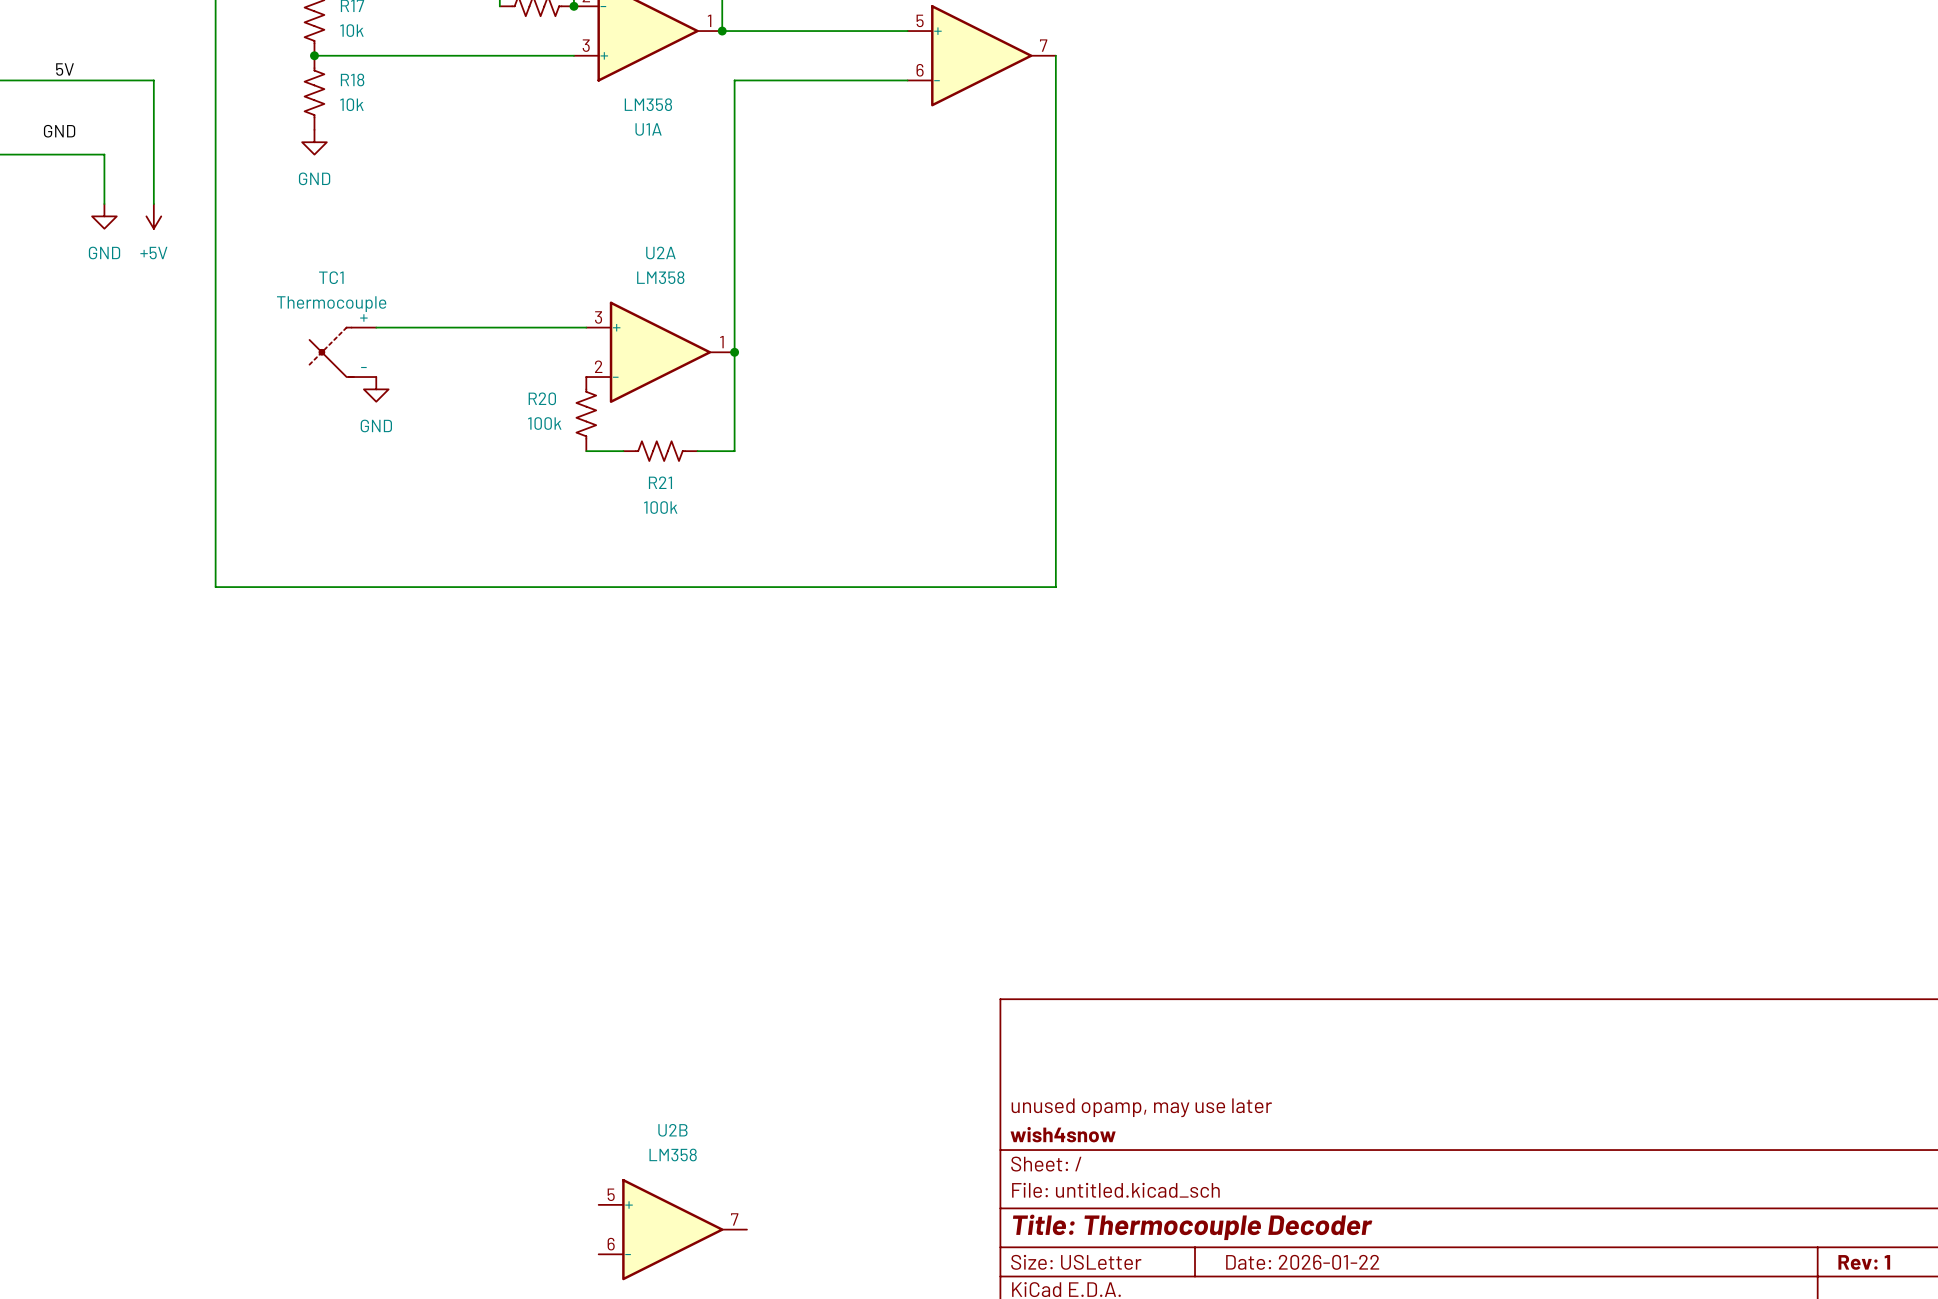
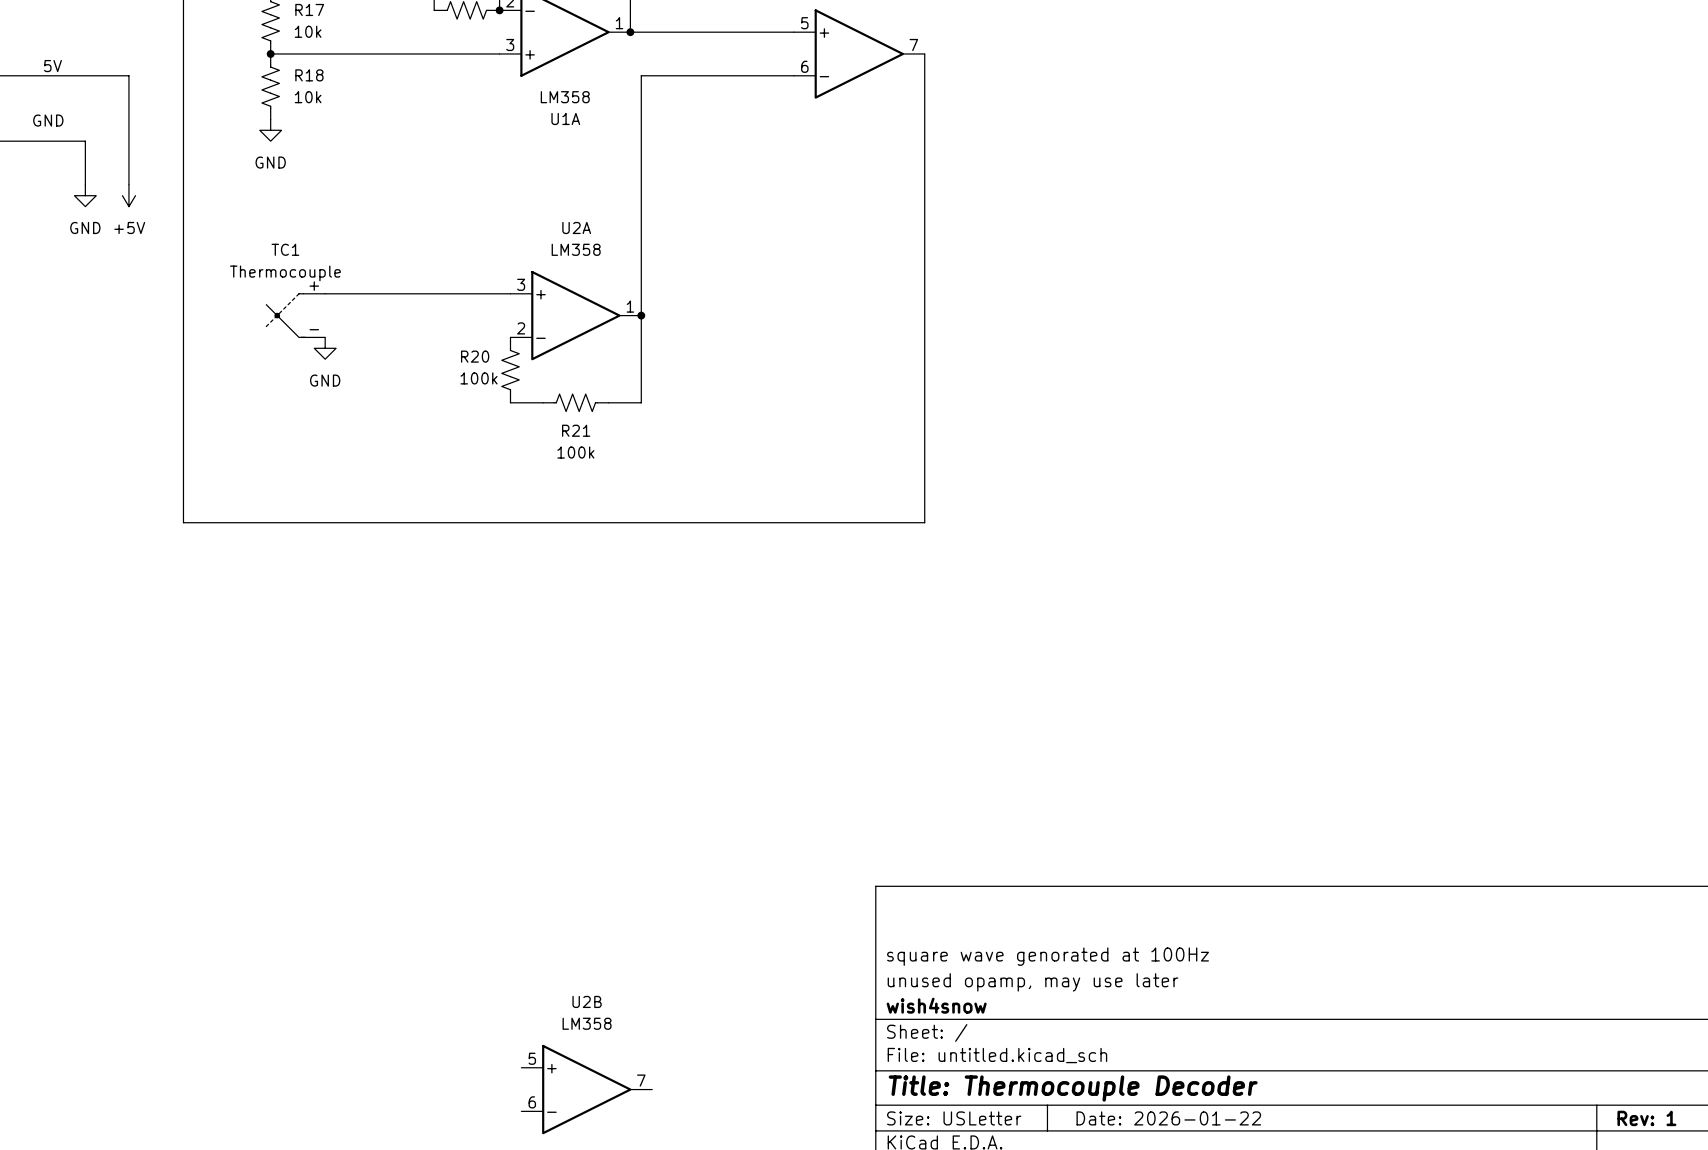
title block: none -> square wave genorated at 100Hz (1048, 956)

